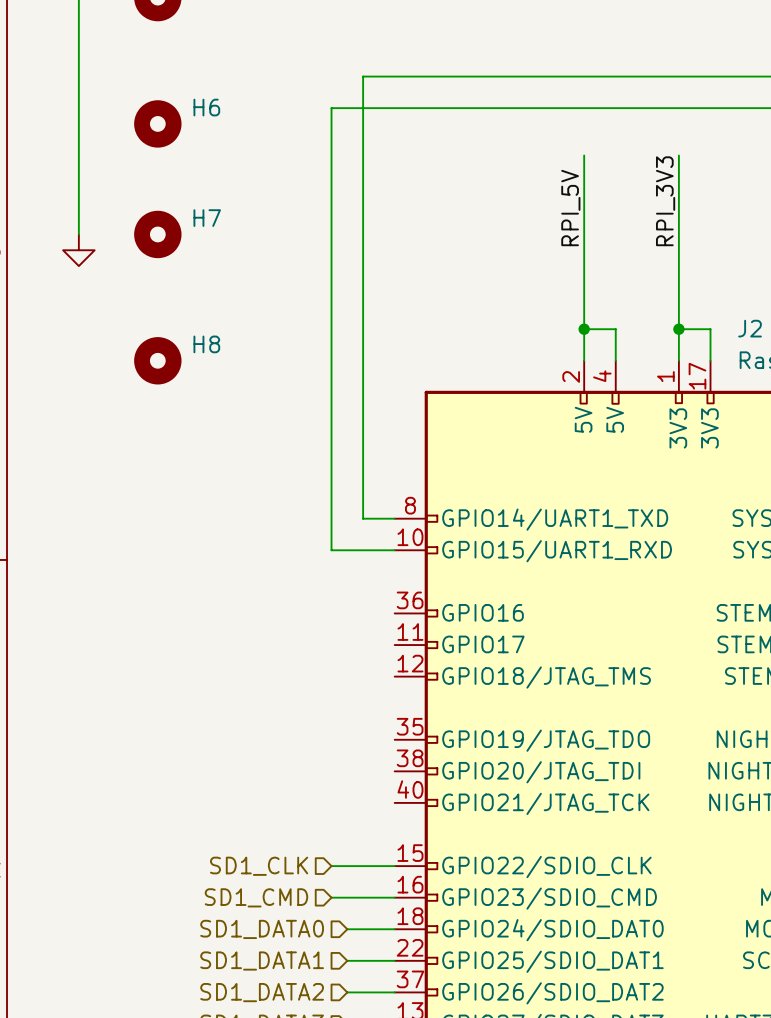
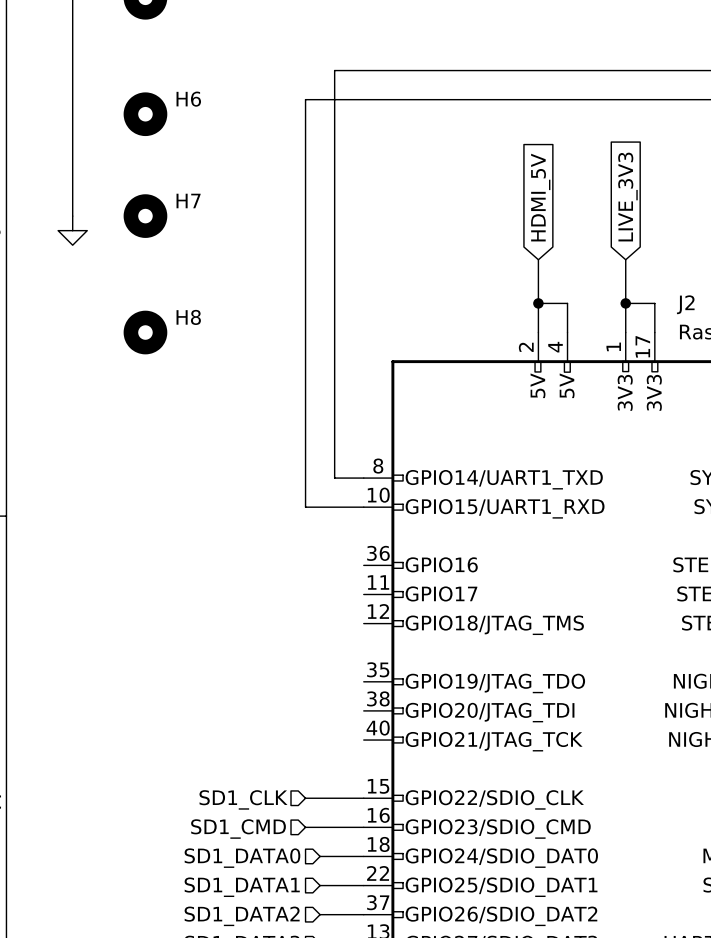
wire: (584, 155) (584, 281) -> none
wire: (678, 155) (678, 281) -> none
label: RPI_3V3 (665, 201) -> none
label: RPI_5V (570, 208) -> none
global label: none -> LIVE_3V3 (627, 197)
global label: none -> HDMI_5V (540, 197)

